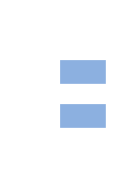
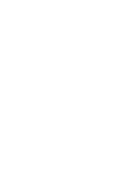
part: (82, 71) -> none
part: (82, 115) -> none

